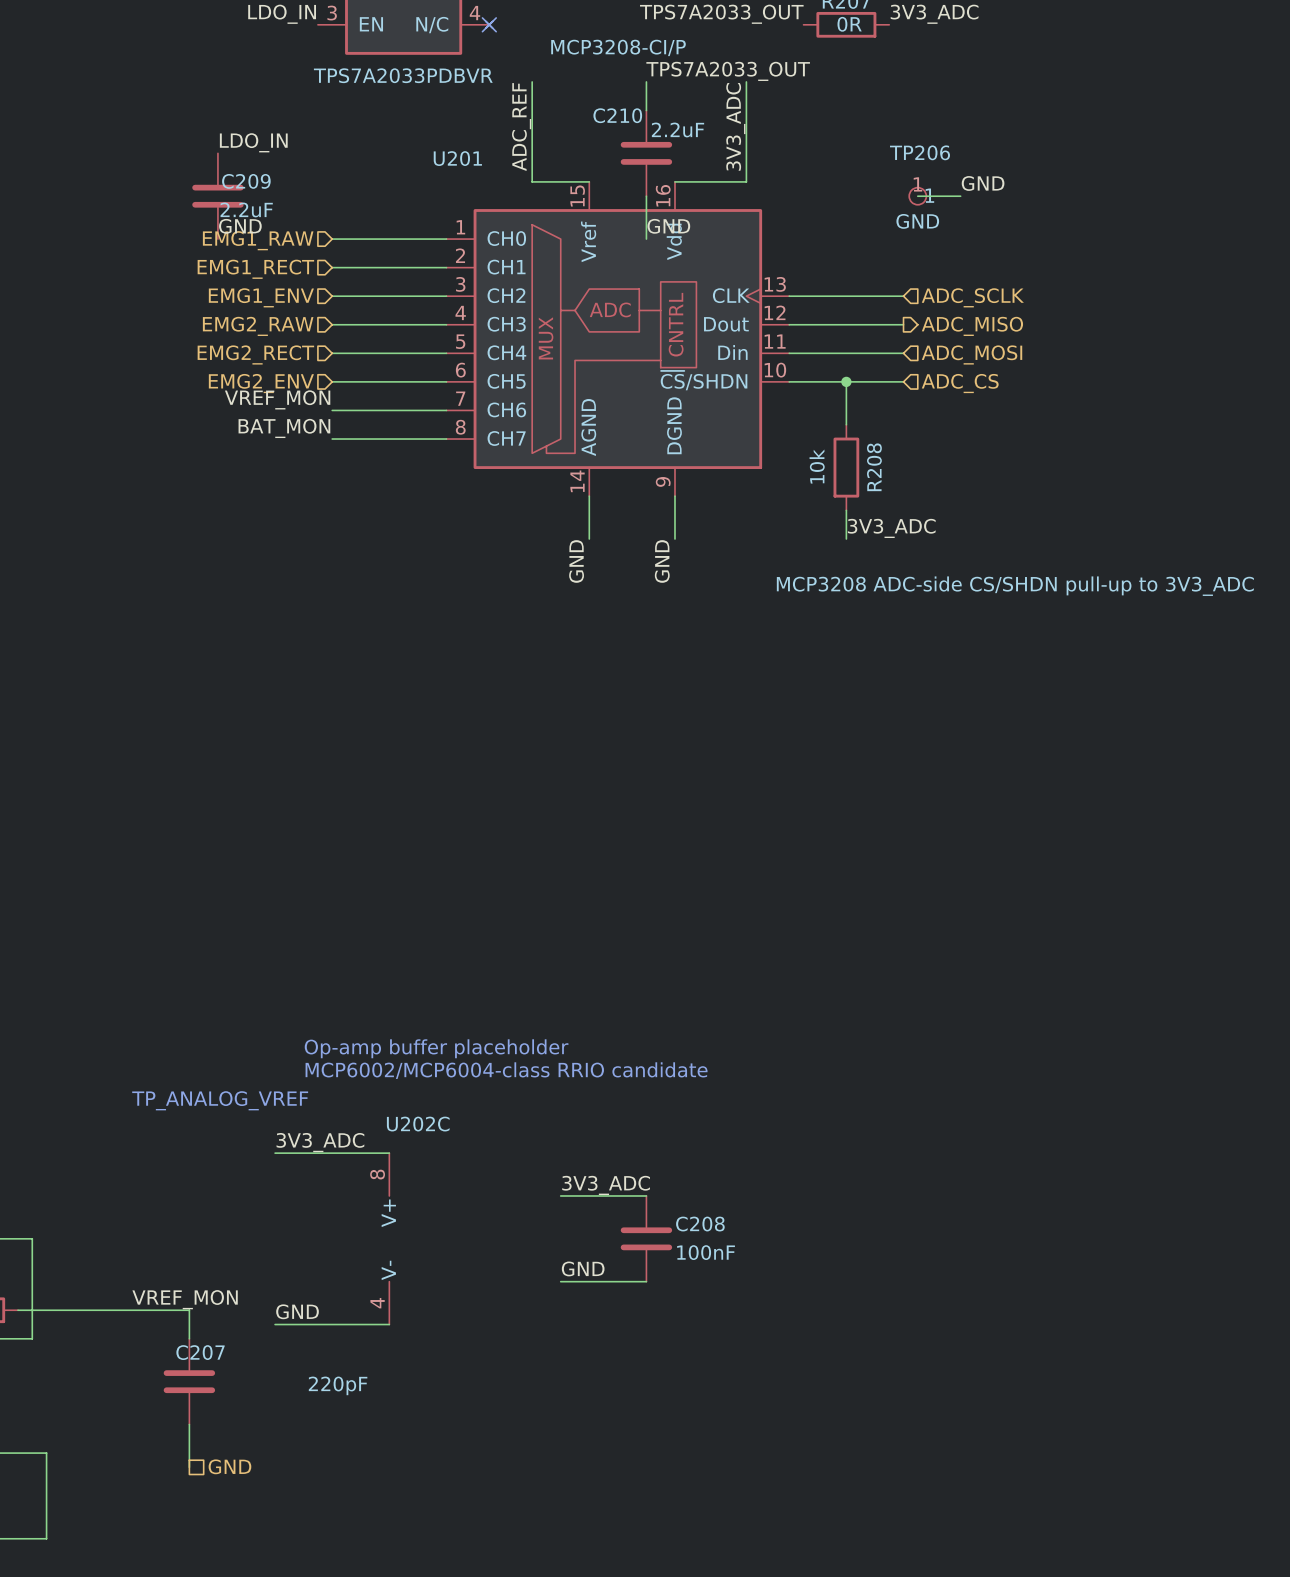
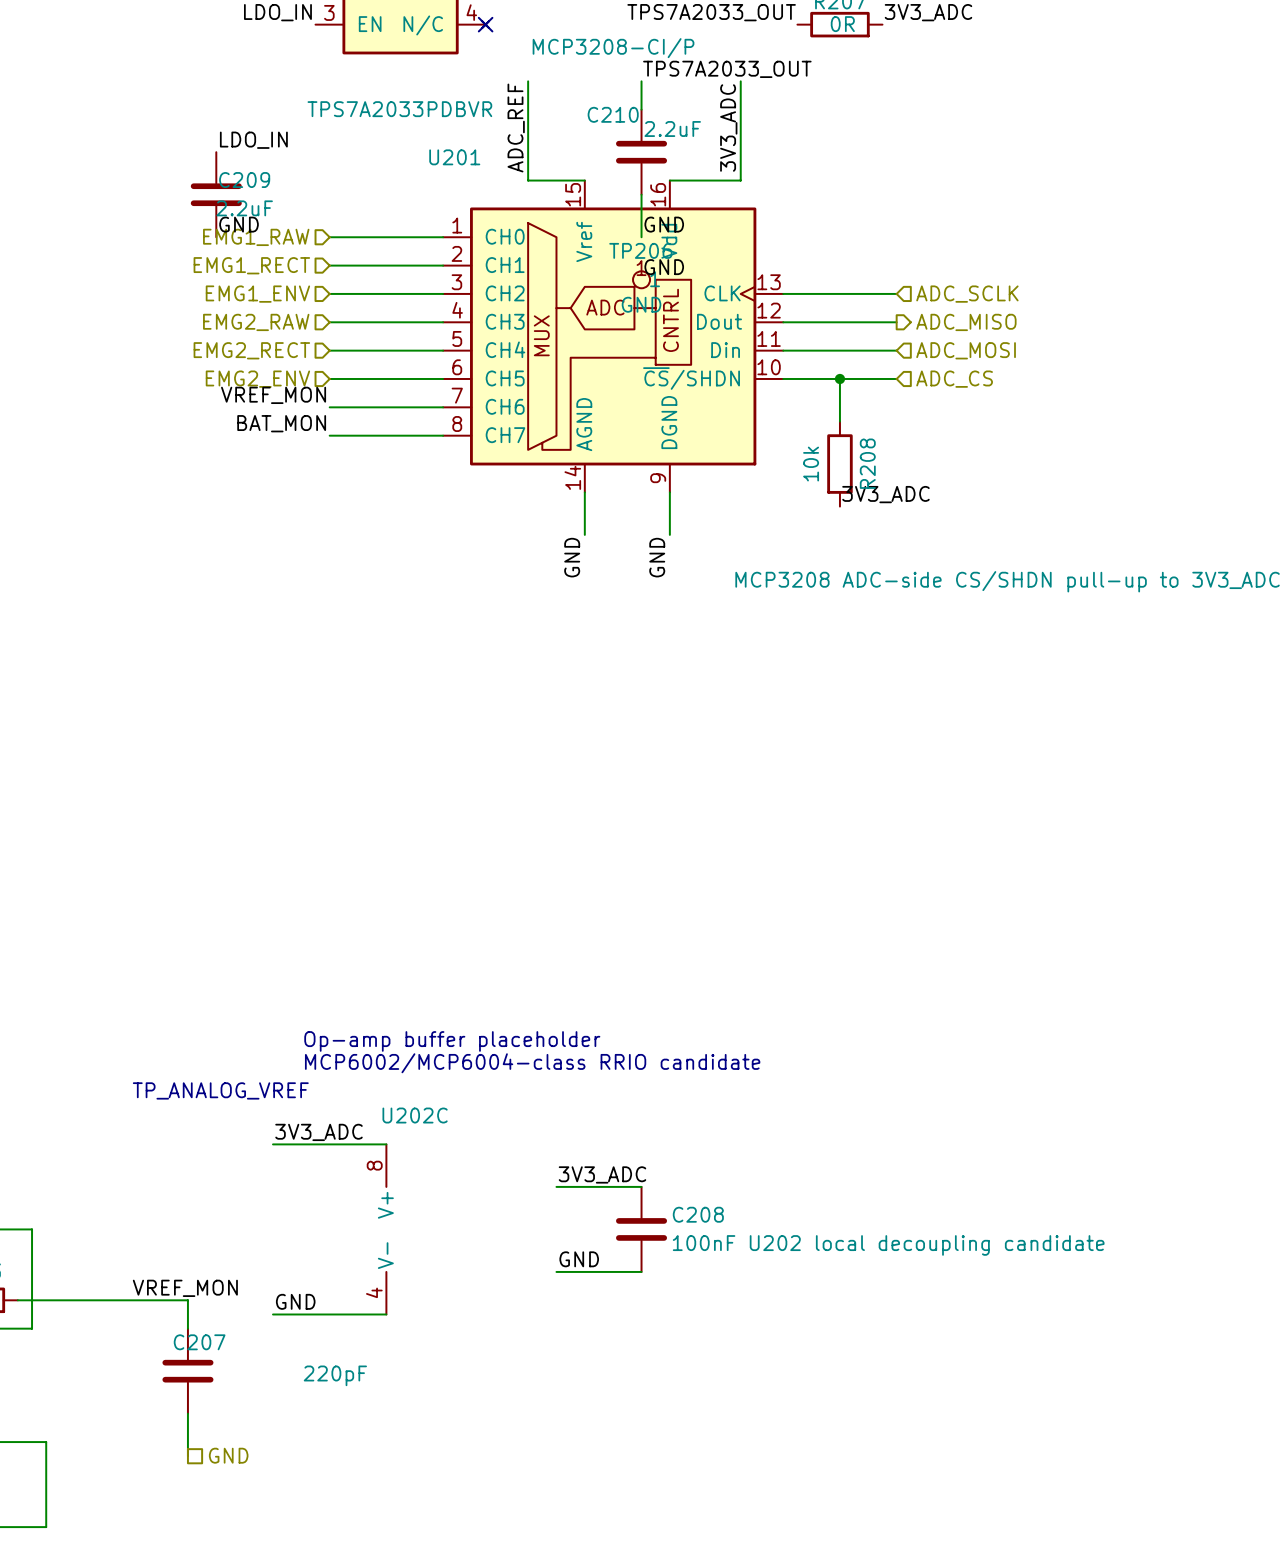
part value position: TPS7A2033PDBVR (403, 75) -> TPS7A2033PDBVR (399, 109)
TP206 name position: TP206 (920, 152) -> TP206 (640, 250)
label: GND (983, 183) -> none
wire: (917, 196) (960, 196) -> none
TP206 position: (917, 196) -> (641, 279)
label: none -> GND (664, 267)
wire: (846, 510) (846, 538) -> none
label position: 3V3_ADC (891, 528) -> 3V3_ADC (885, 494)
C208 value: 100nF (706, 1252) -> 100nF U202 local decoupling candidate (888, 1245)

